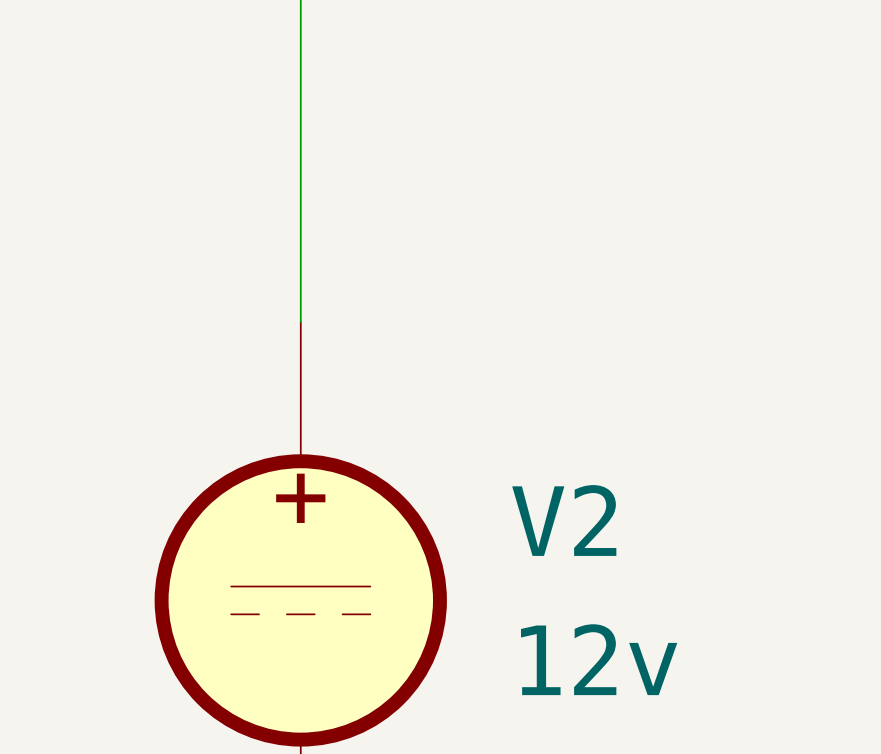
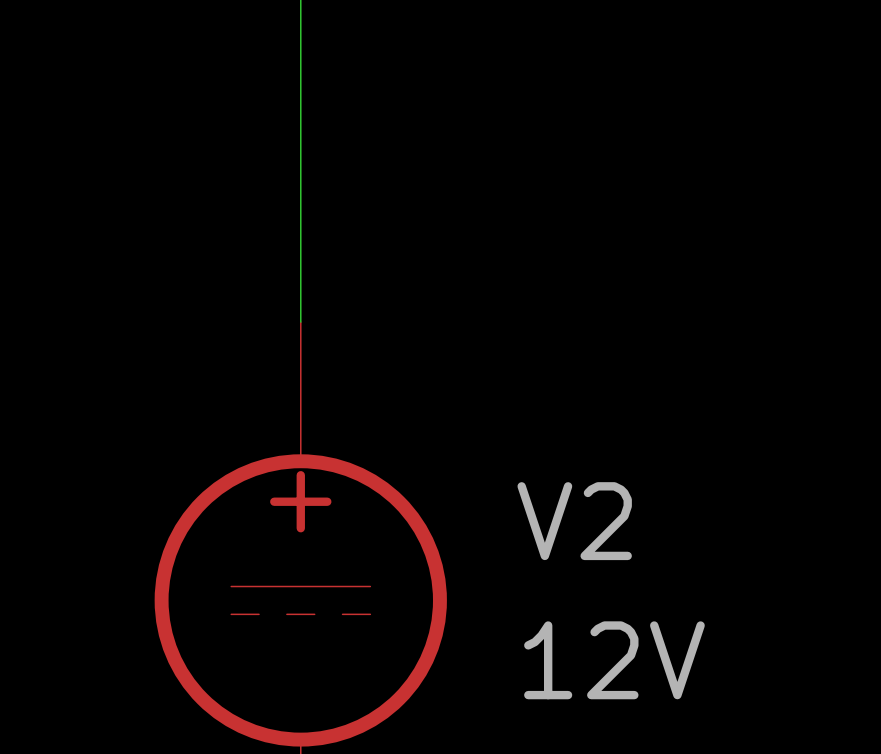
V2 value: 12v (599, 659) -> 12V (614, 660)

